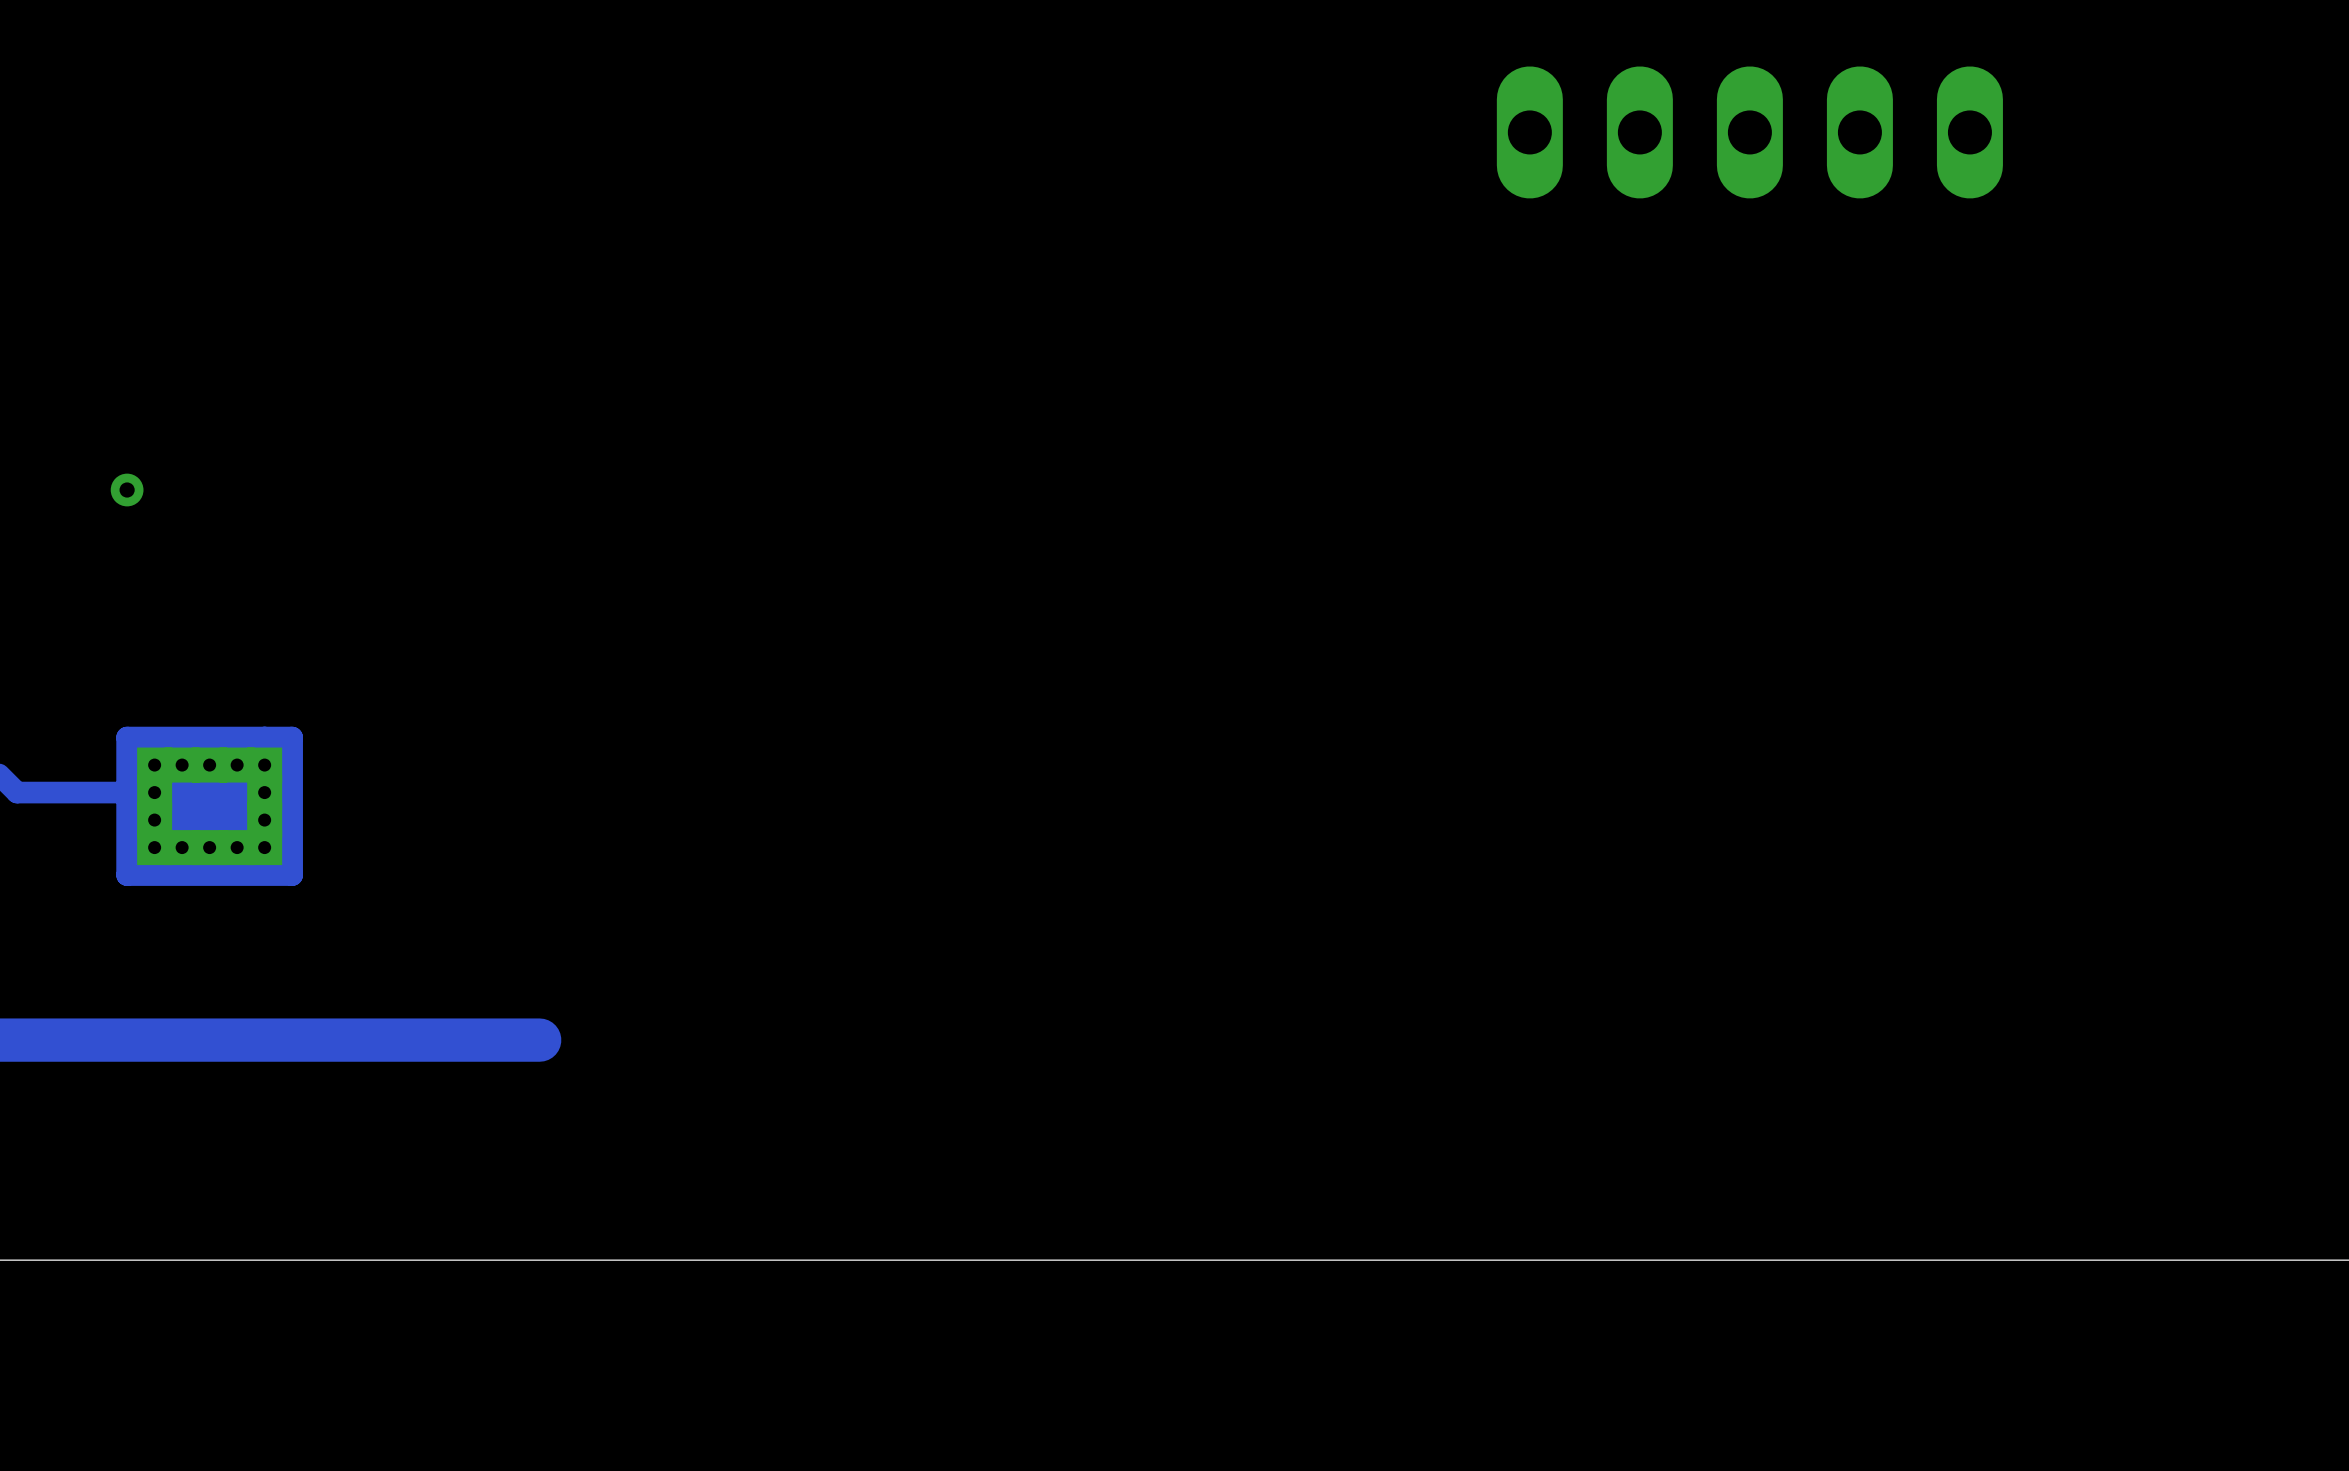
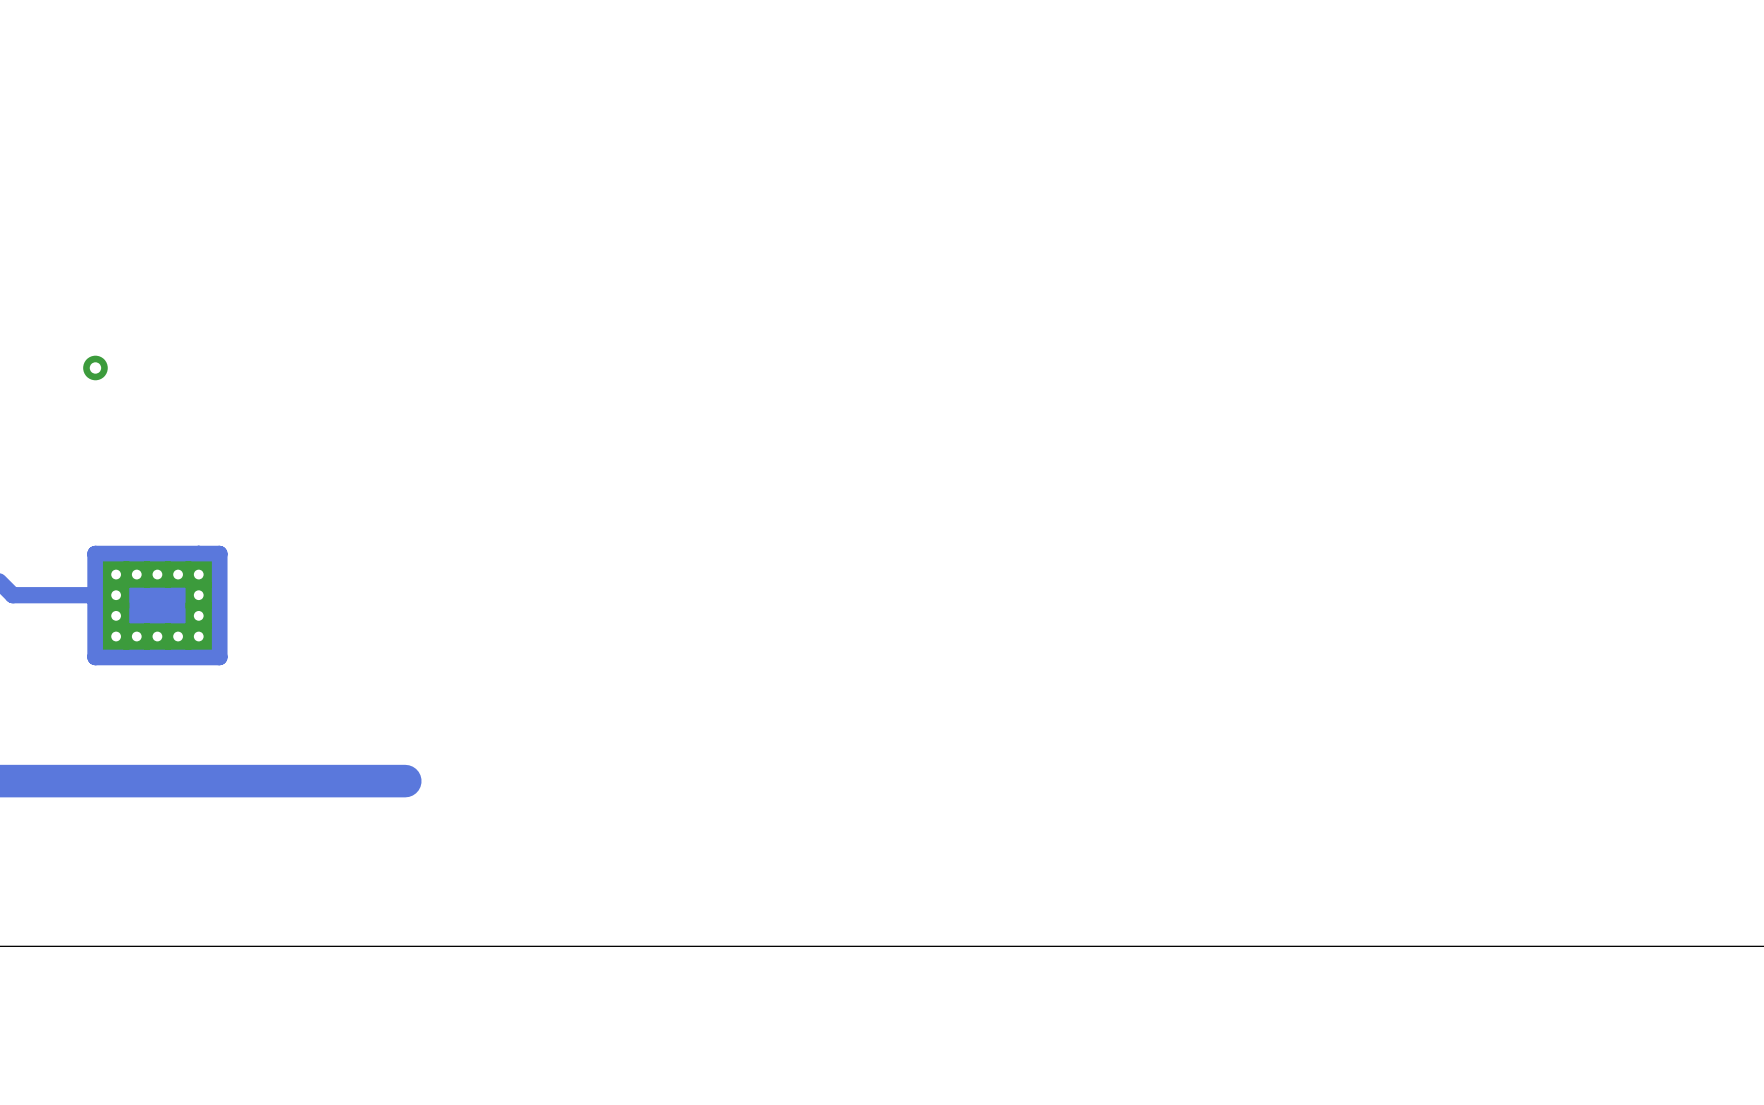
part: (1749, 132) -> none

